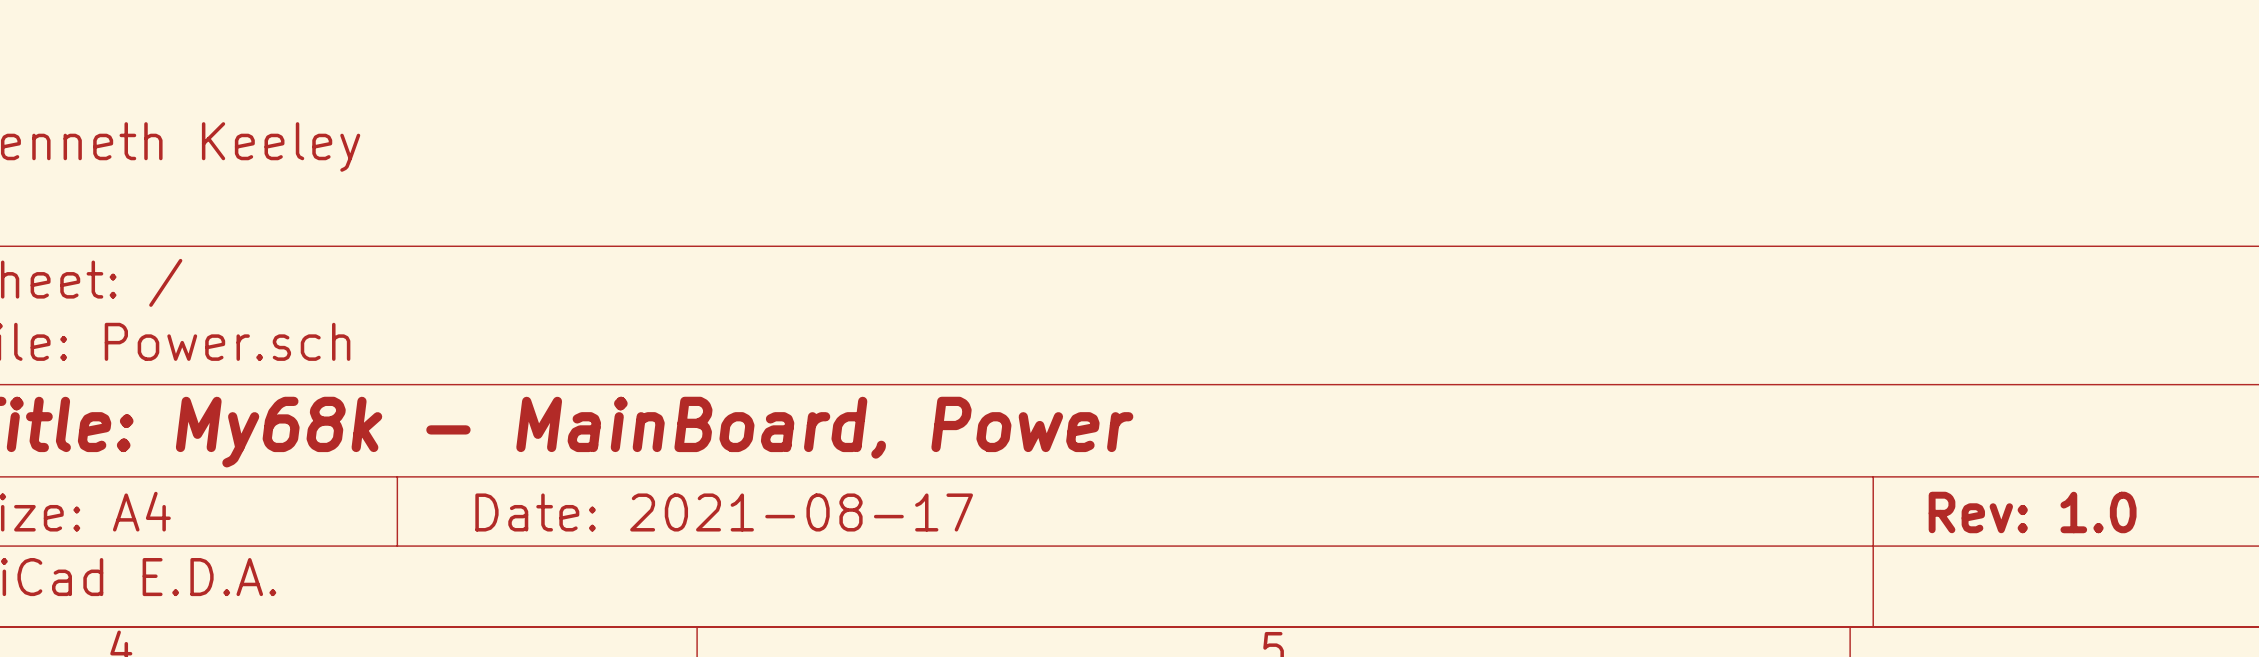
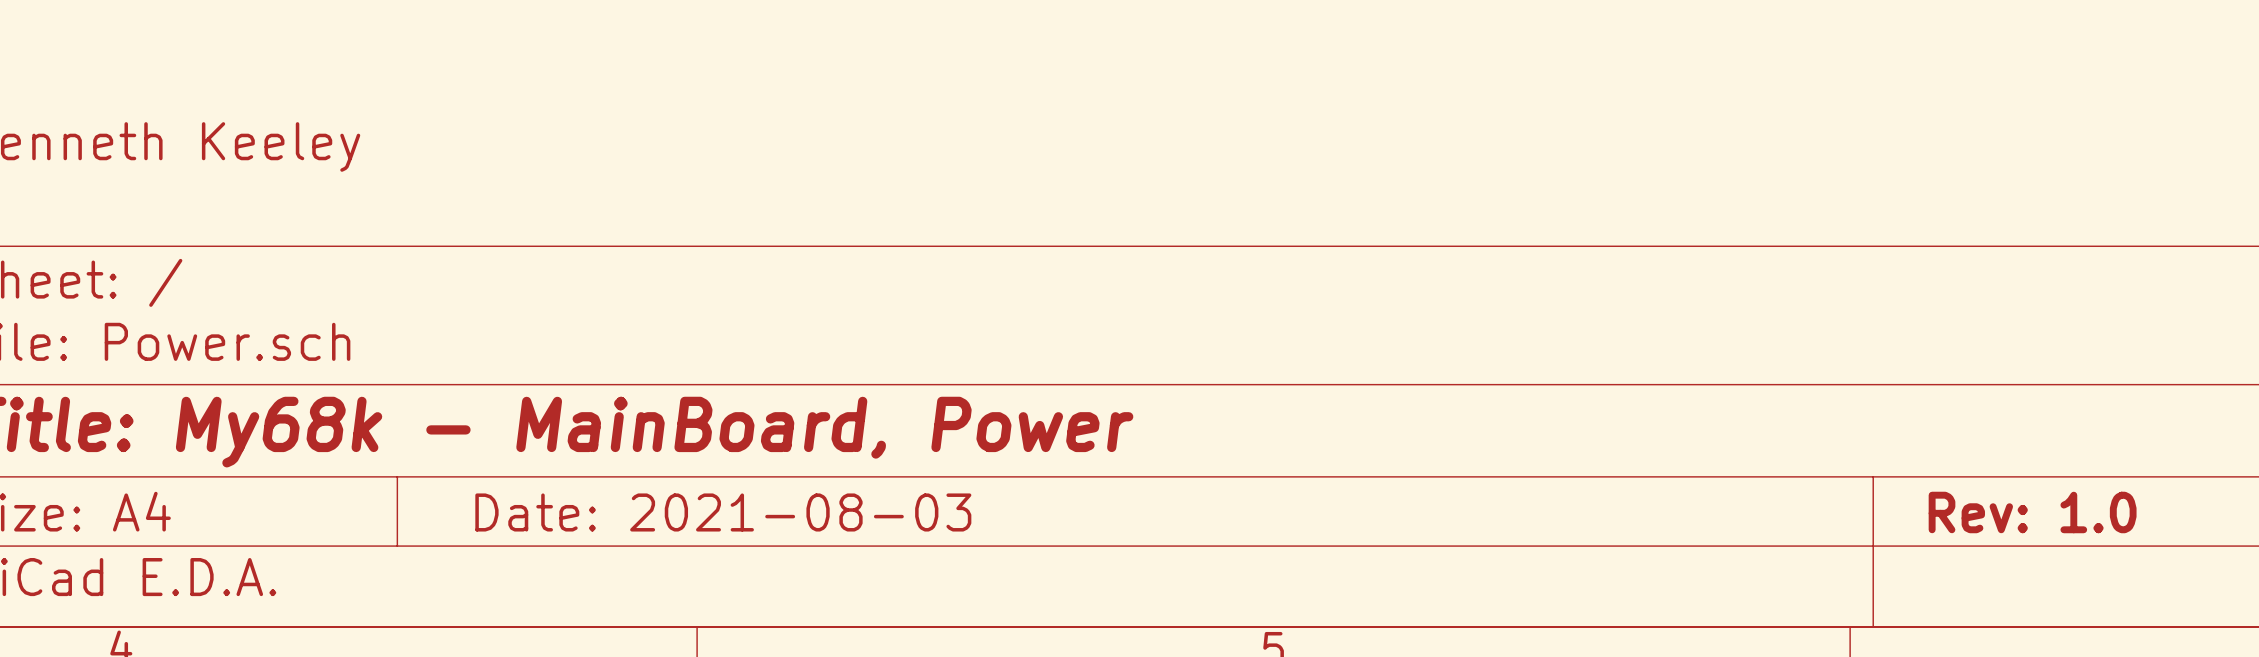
title block: Date: 2021-08-17 (724, 512) -> Date: 2021-08-03 (723, 512)

